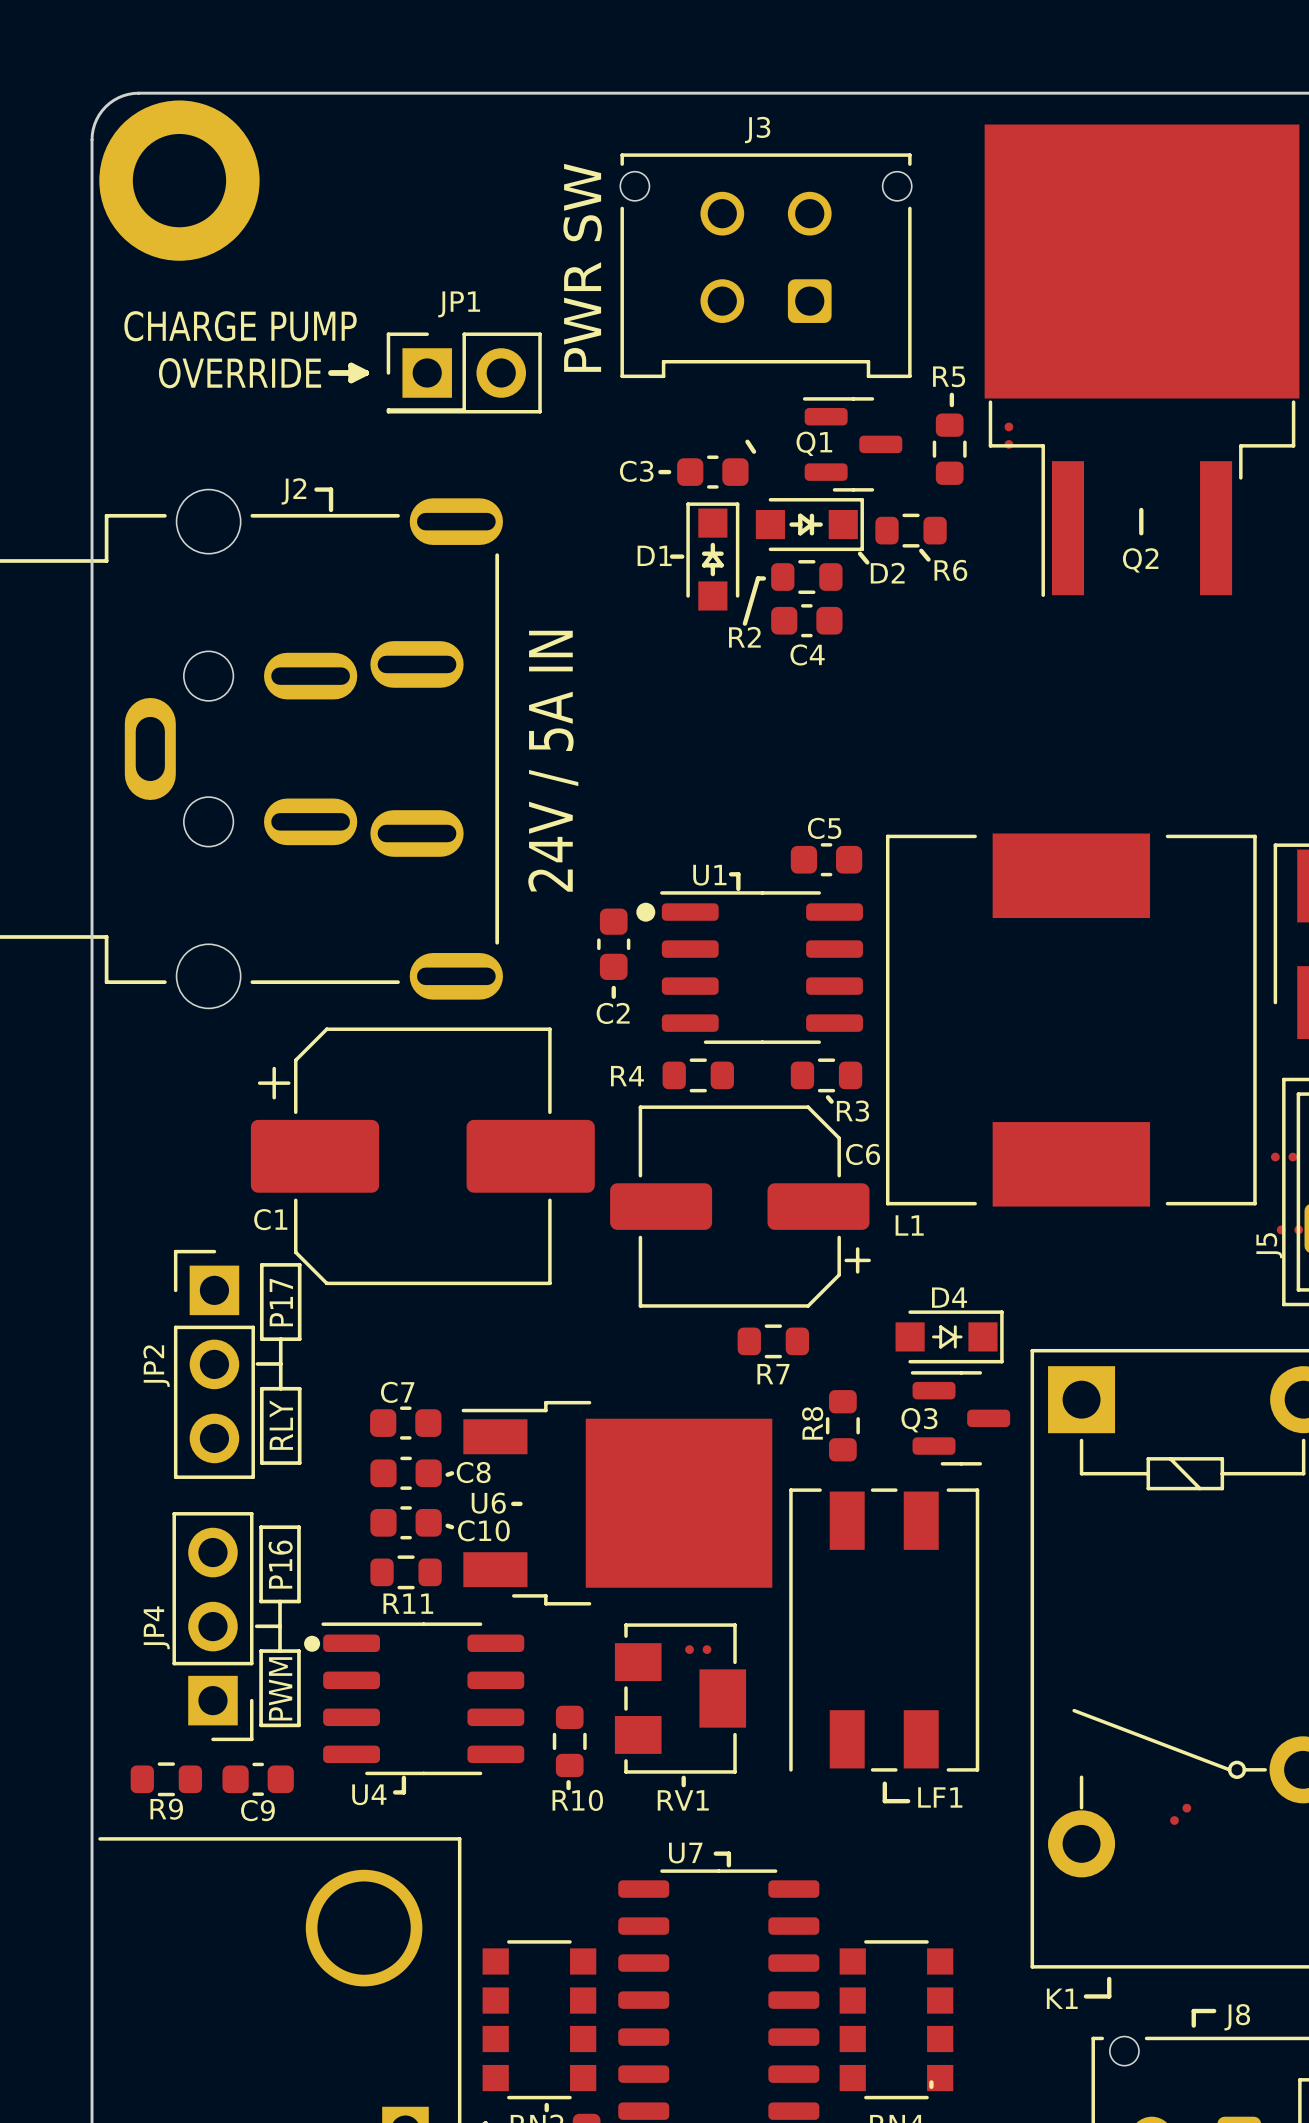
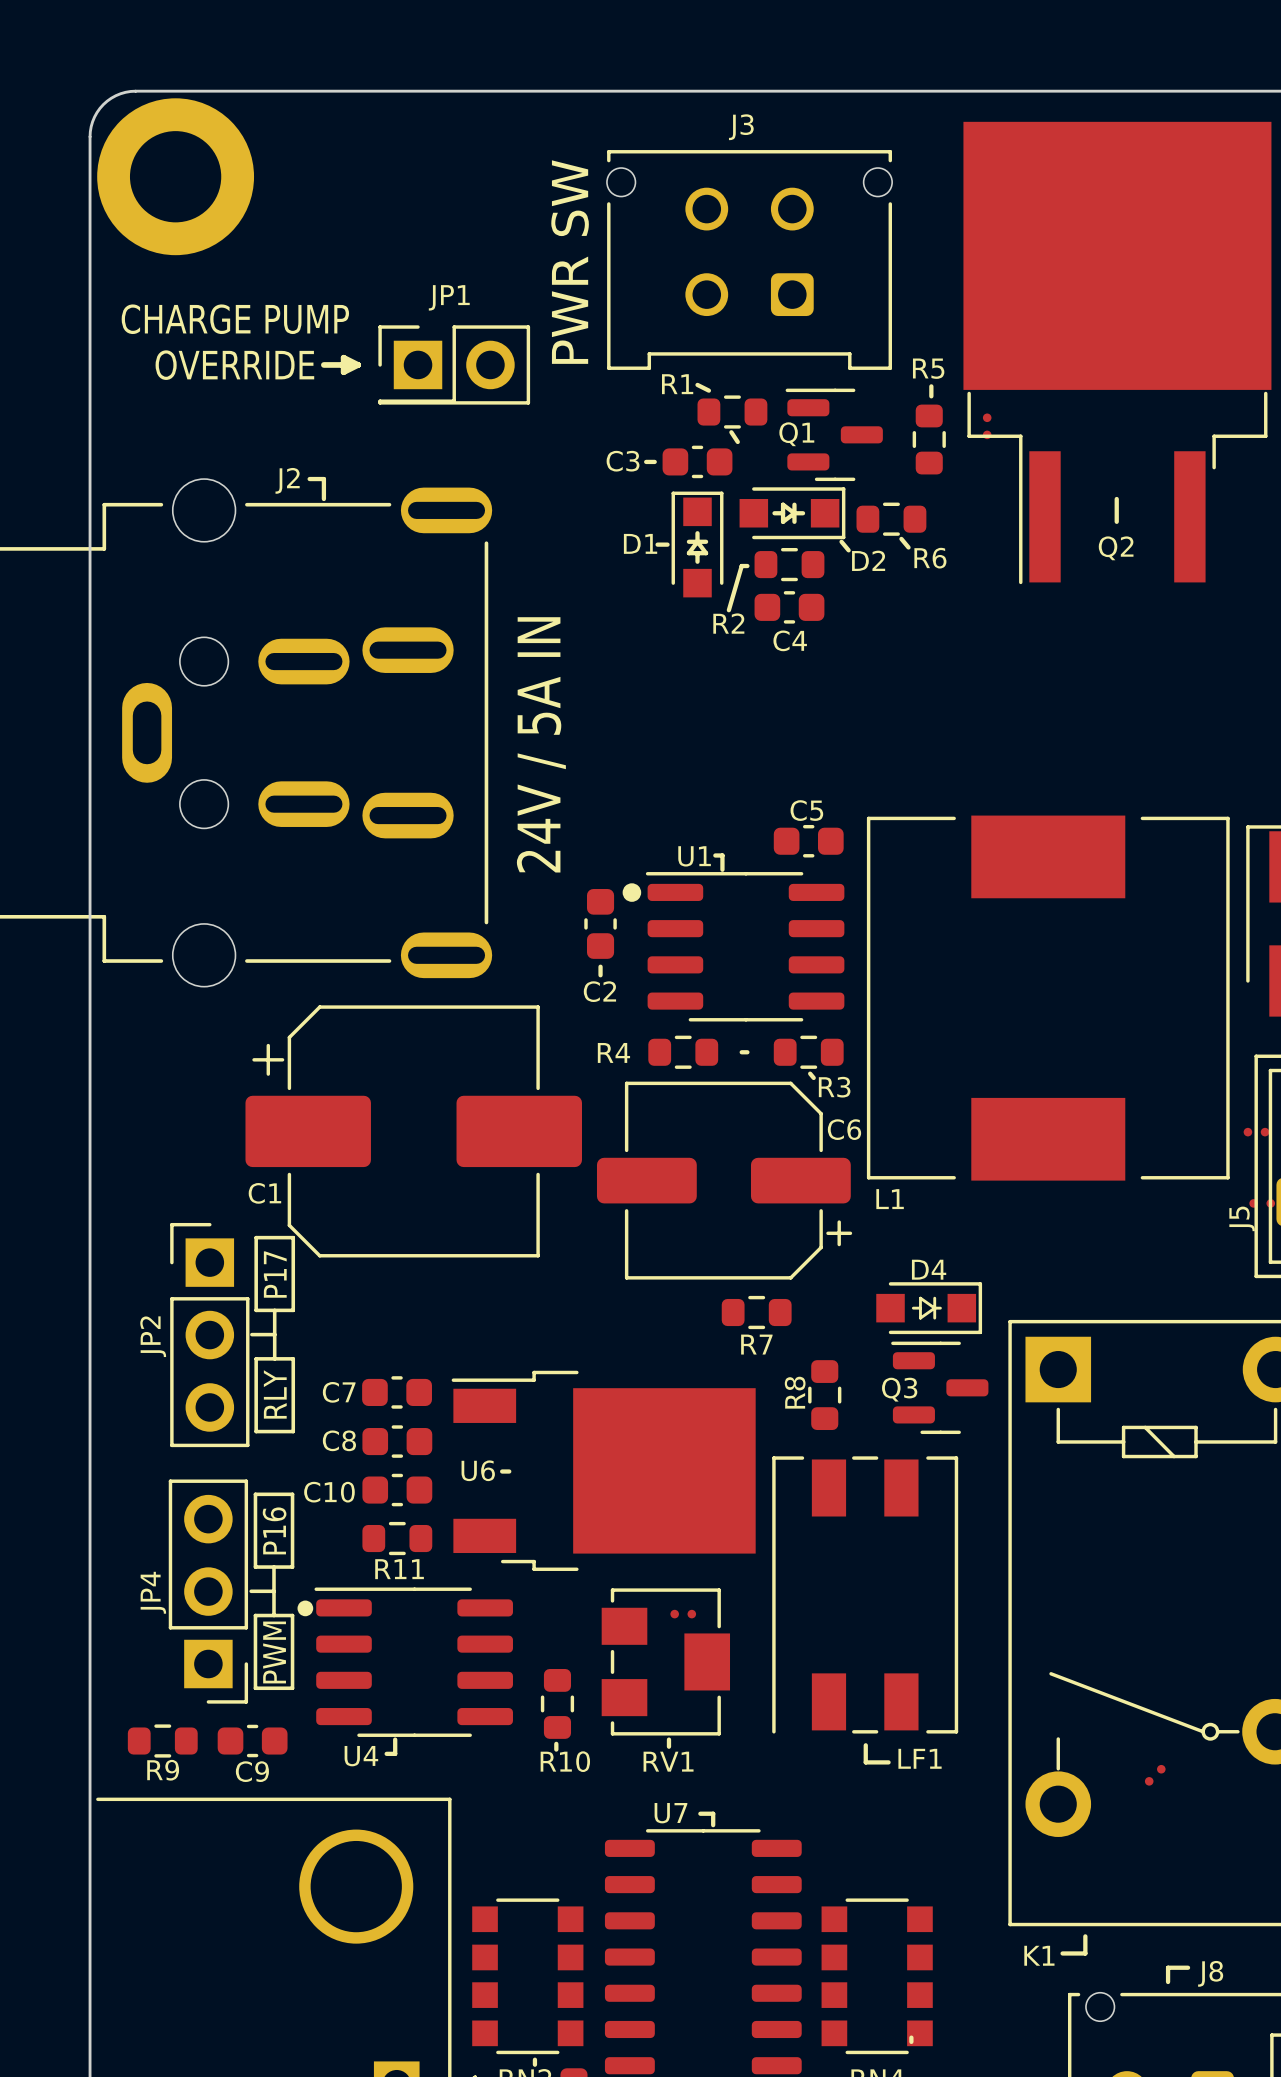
line: none -> (697, 384) (708, 390)
R1: none -> (732, 412)
line: none -> (741, 1052) (747, 1052)
C7 name position: C7 (397, 1392) -> C7 (339, 1392)
C8 name position: C8 (473, 1472) -> C8 (339, 1440)
line: (451, 1473) (447, 1474) -> none
line: (447, 1525) (451, 1527) -> none
C10 name position: C10 (483, 1530) -> C10 (329, 1492)

